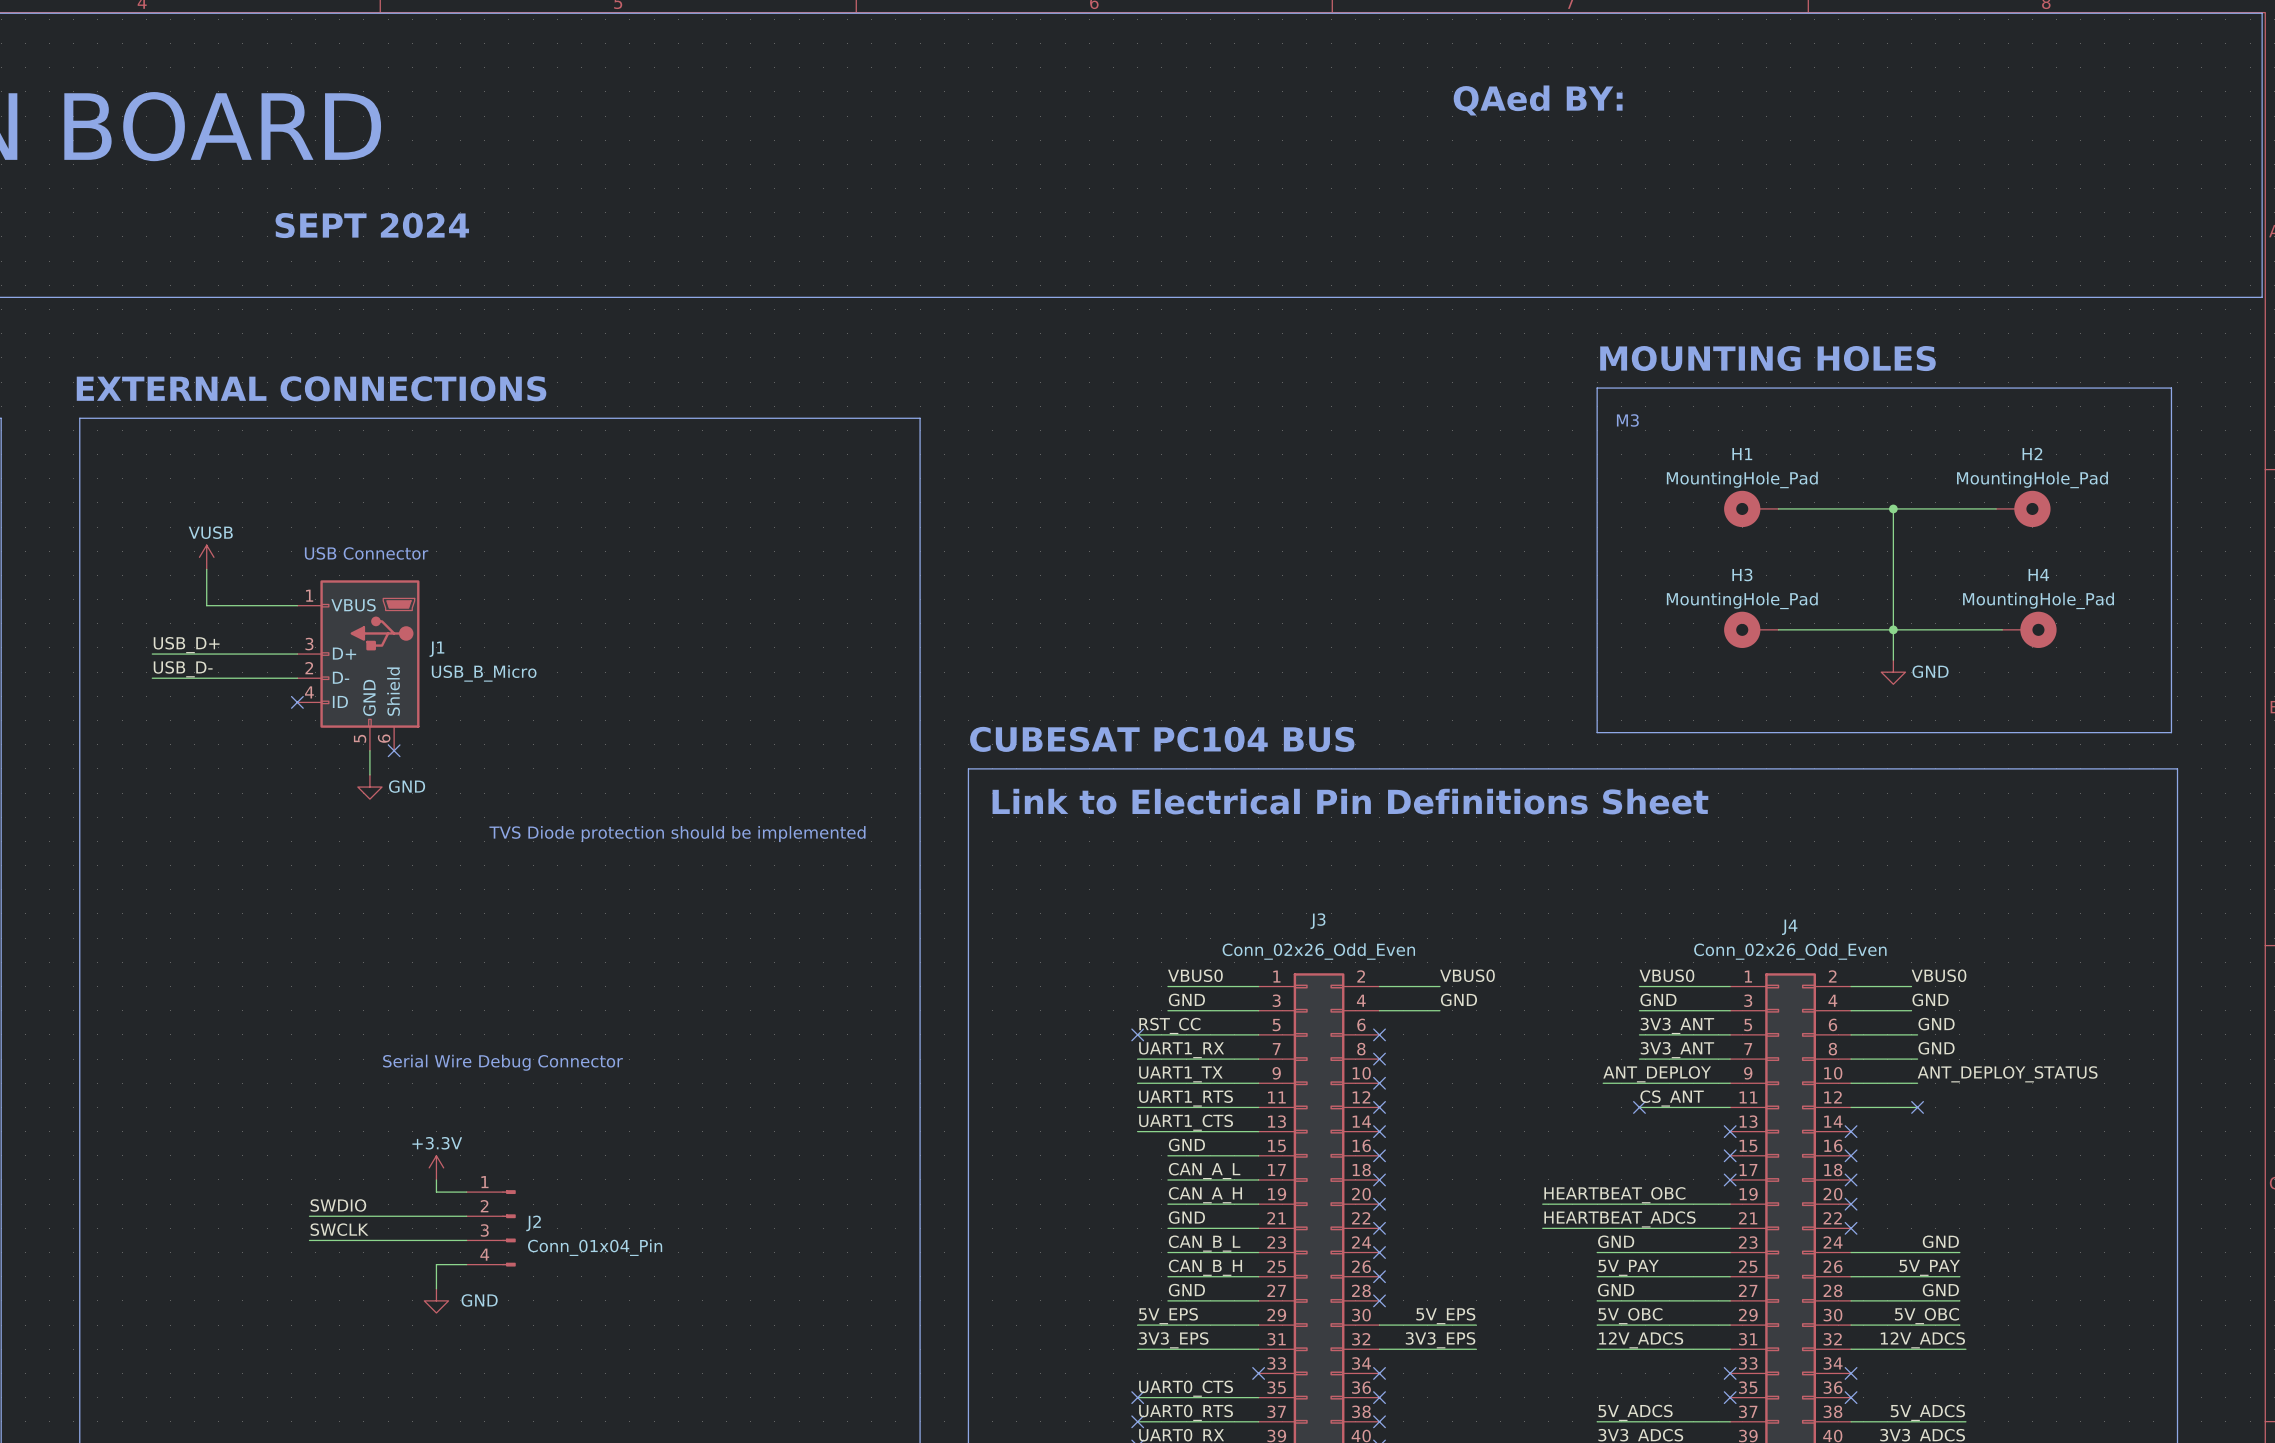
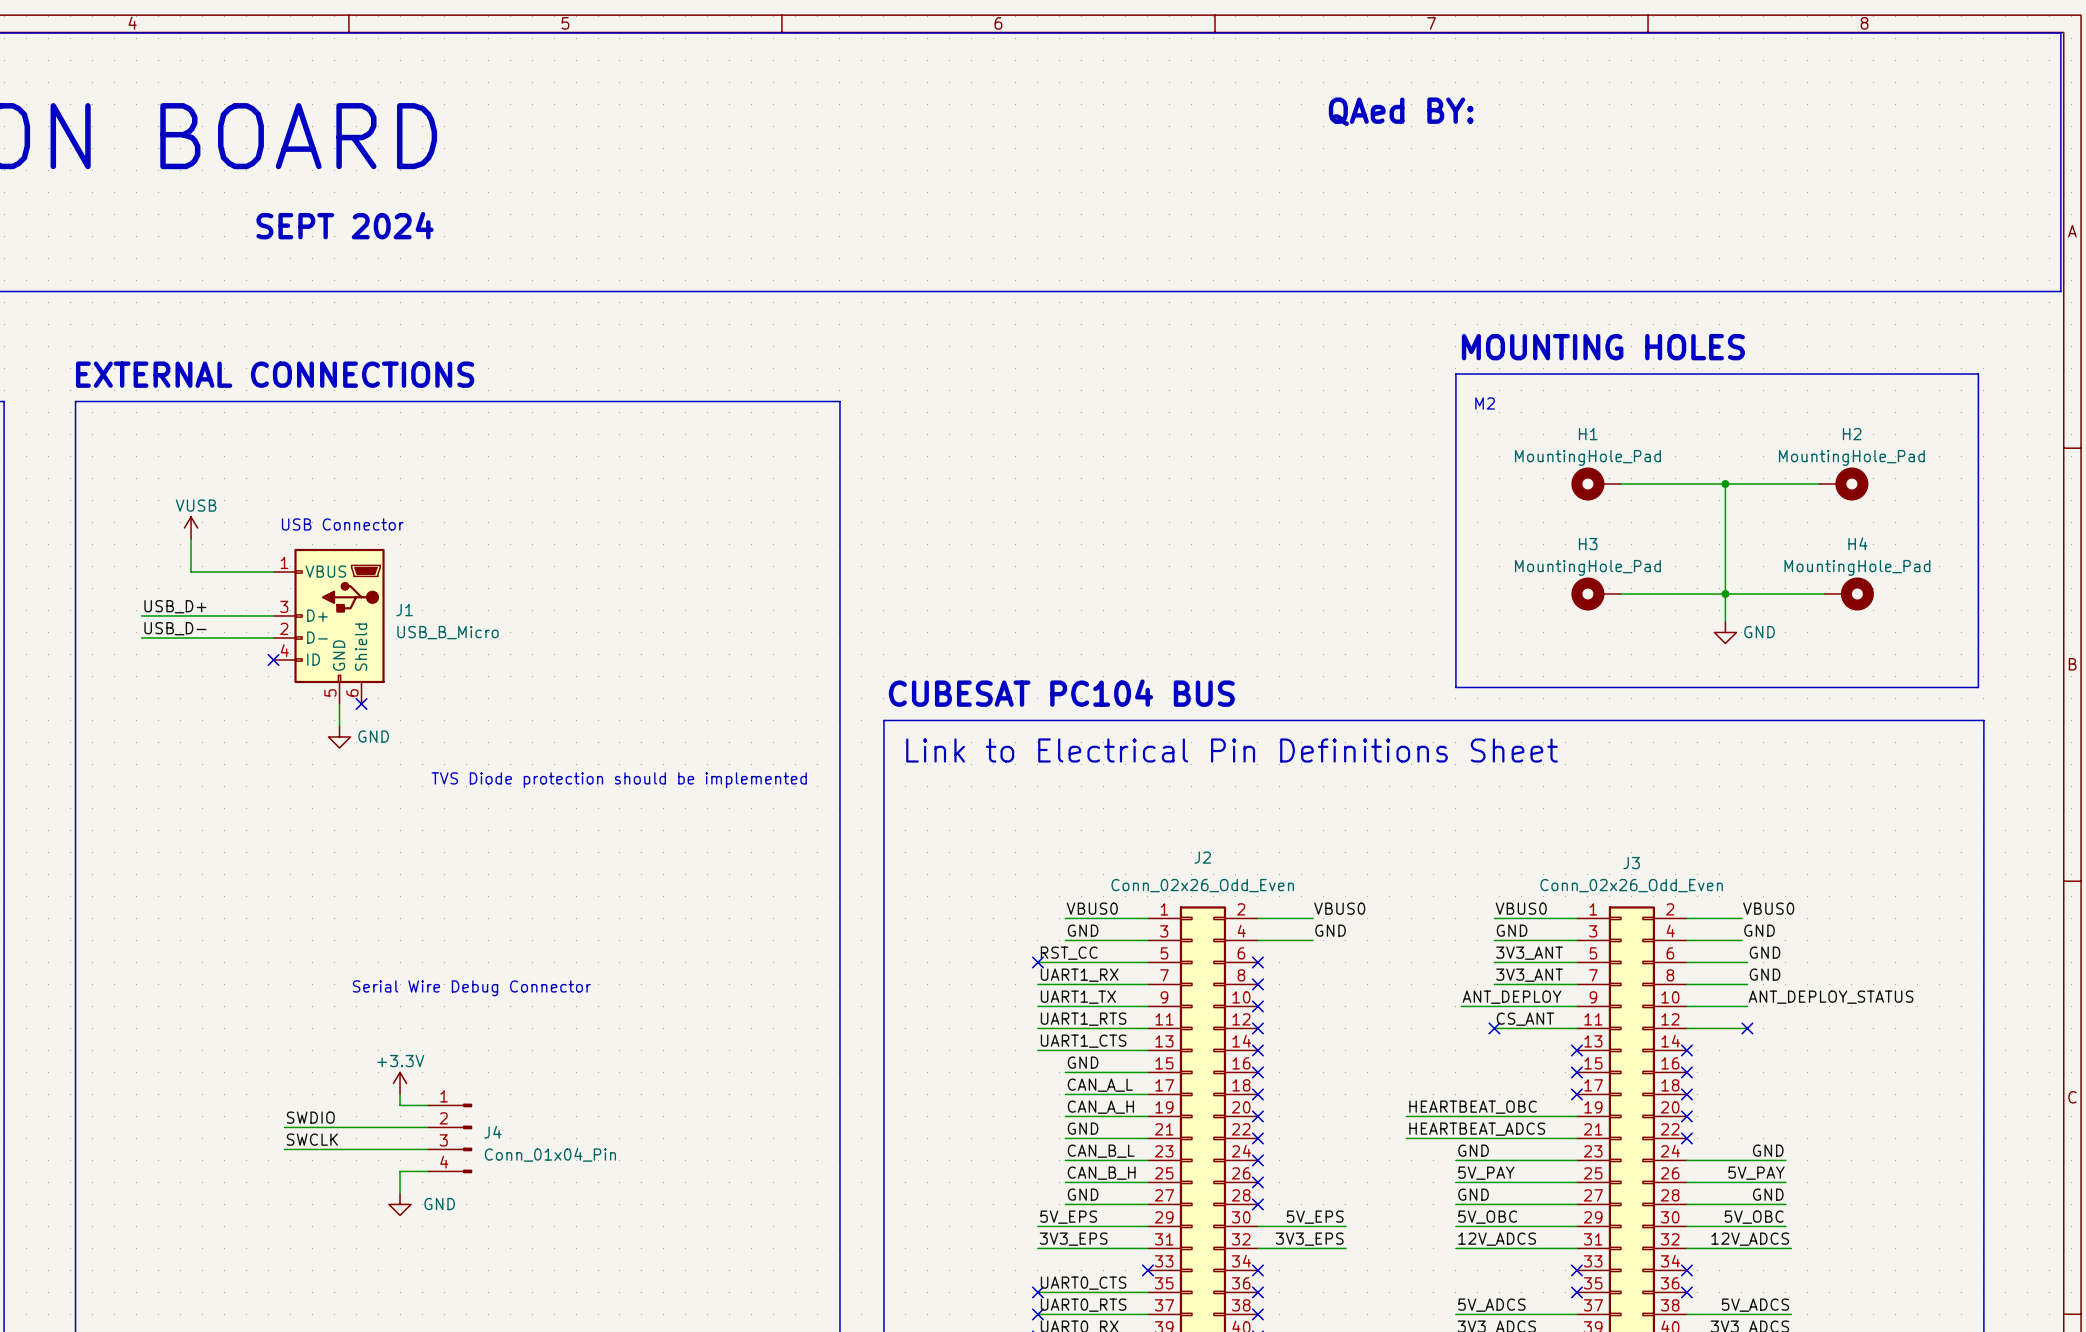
text: M3 (1627, 420) -> M2 (1485, 403)
J3 name: J3 (1317, 921) -> J2 (1202, 857)
J4 name: J4 (1789, 927) -> J3 (1631, 863)
J2 name: J2 (533, 1223) -> J4 (492, 1132)

